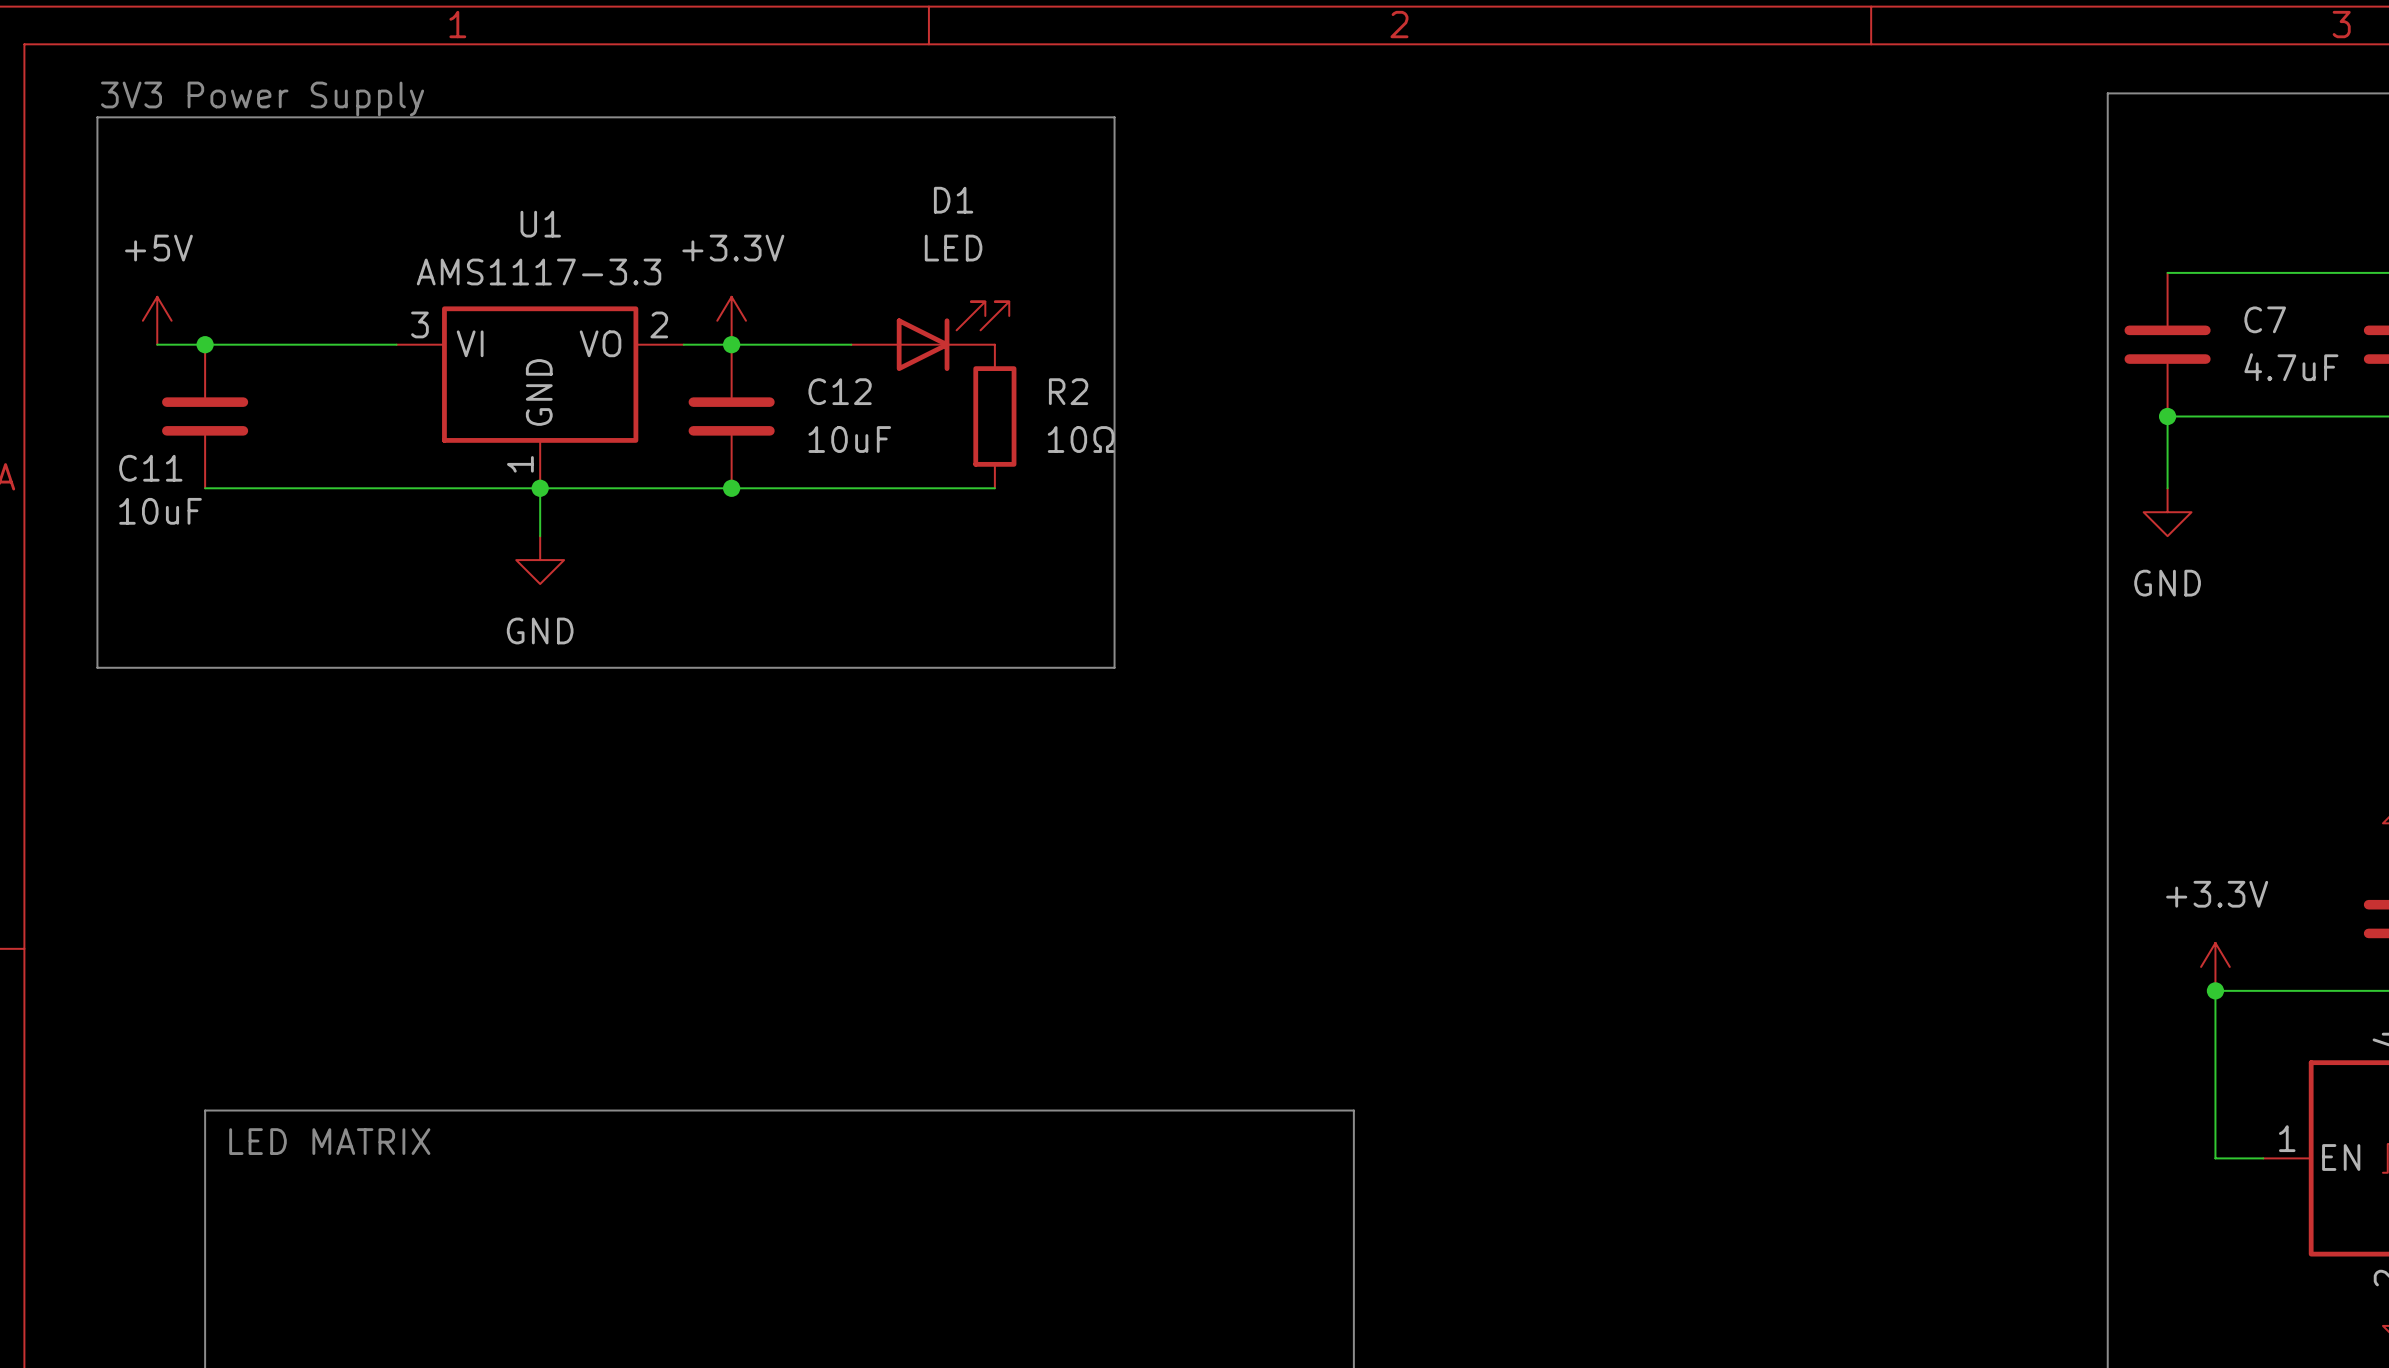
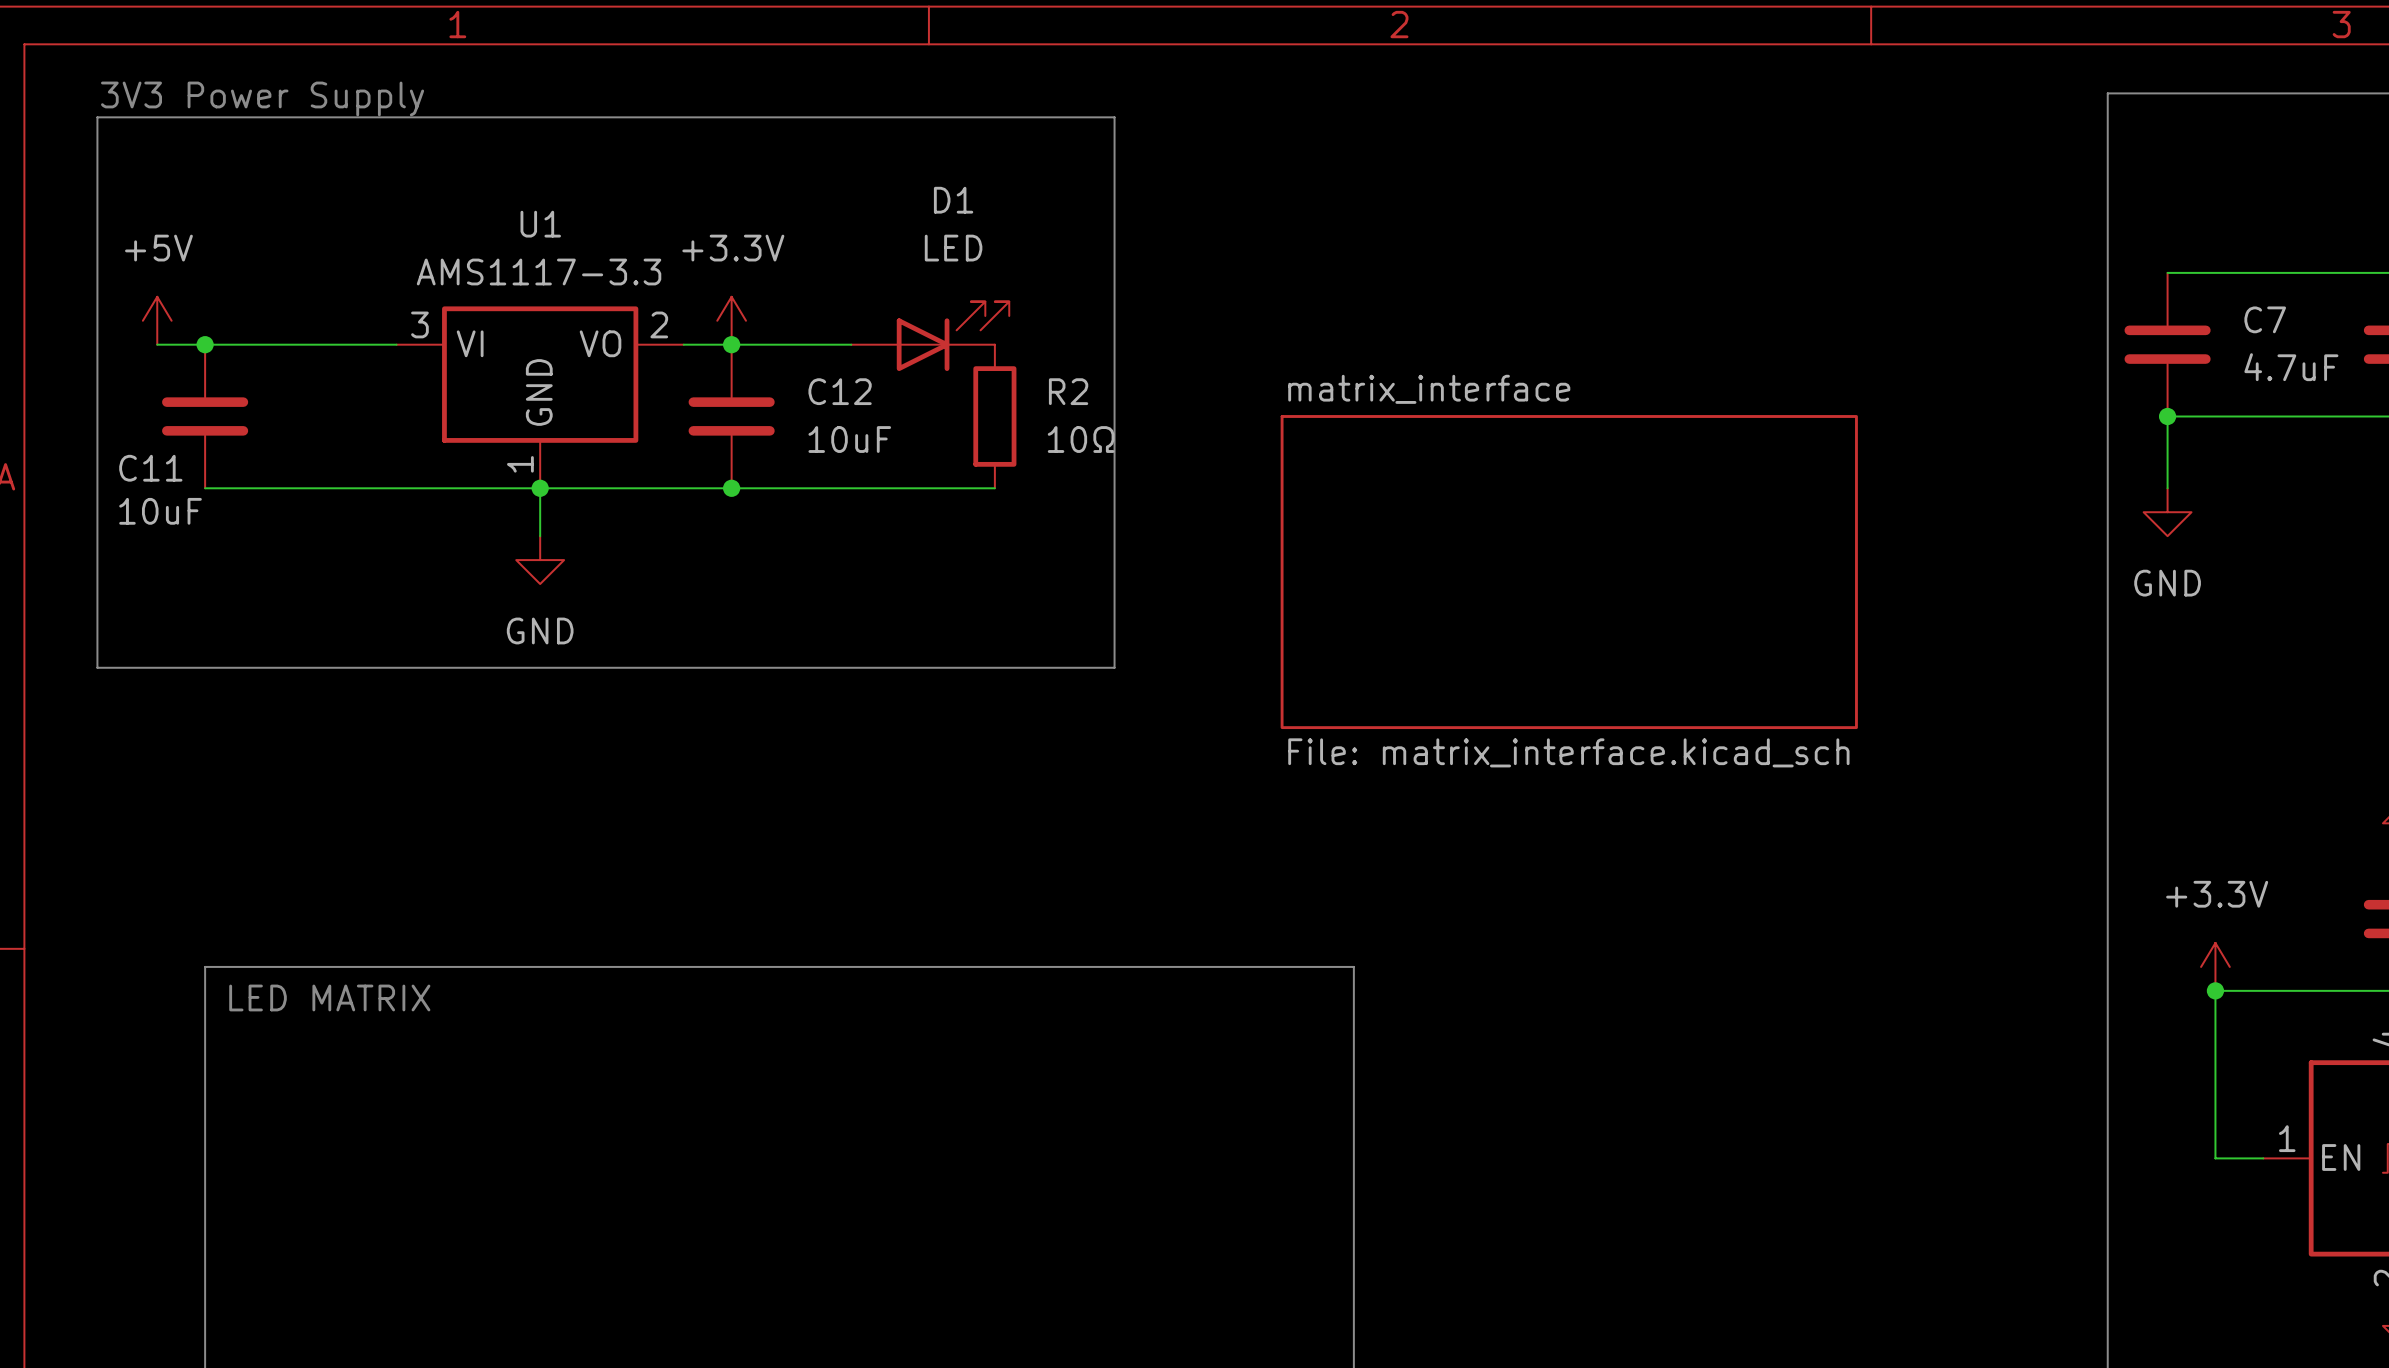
sheet matrix_interface: none -> File: matrix_interface.kicad_sch (1569, 572)
line: (205, 1110) (1353, 1110) -> (205, 1110) (205, 966) (1353, 966) (1353, 1110)
text position: LED MATRIX (329, 1141) -> LED MATRIX (329, 997)

